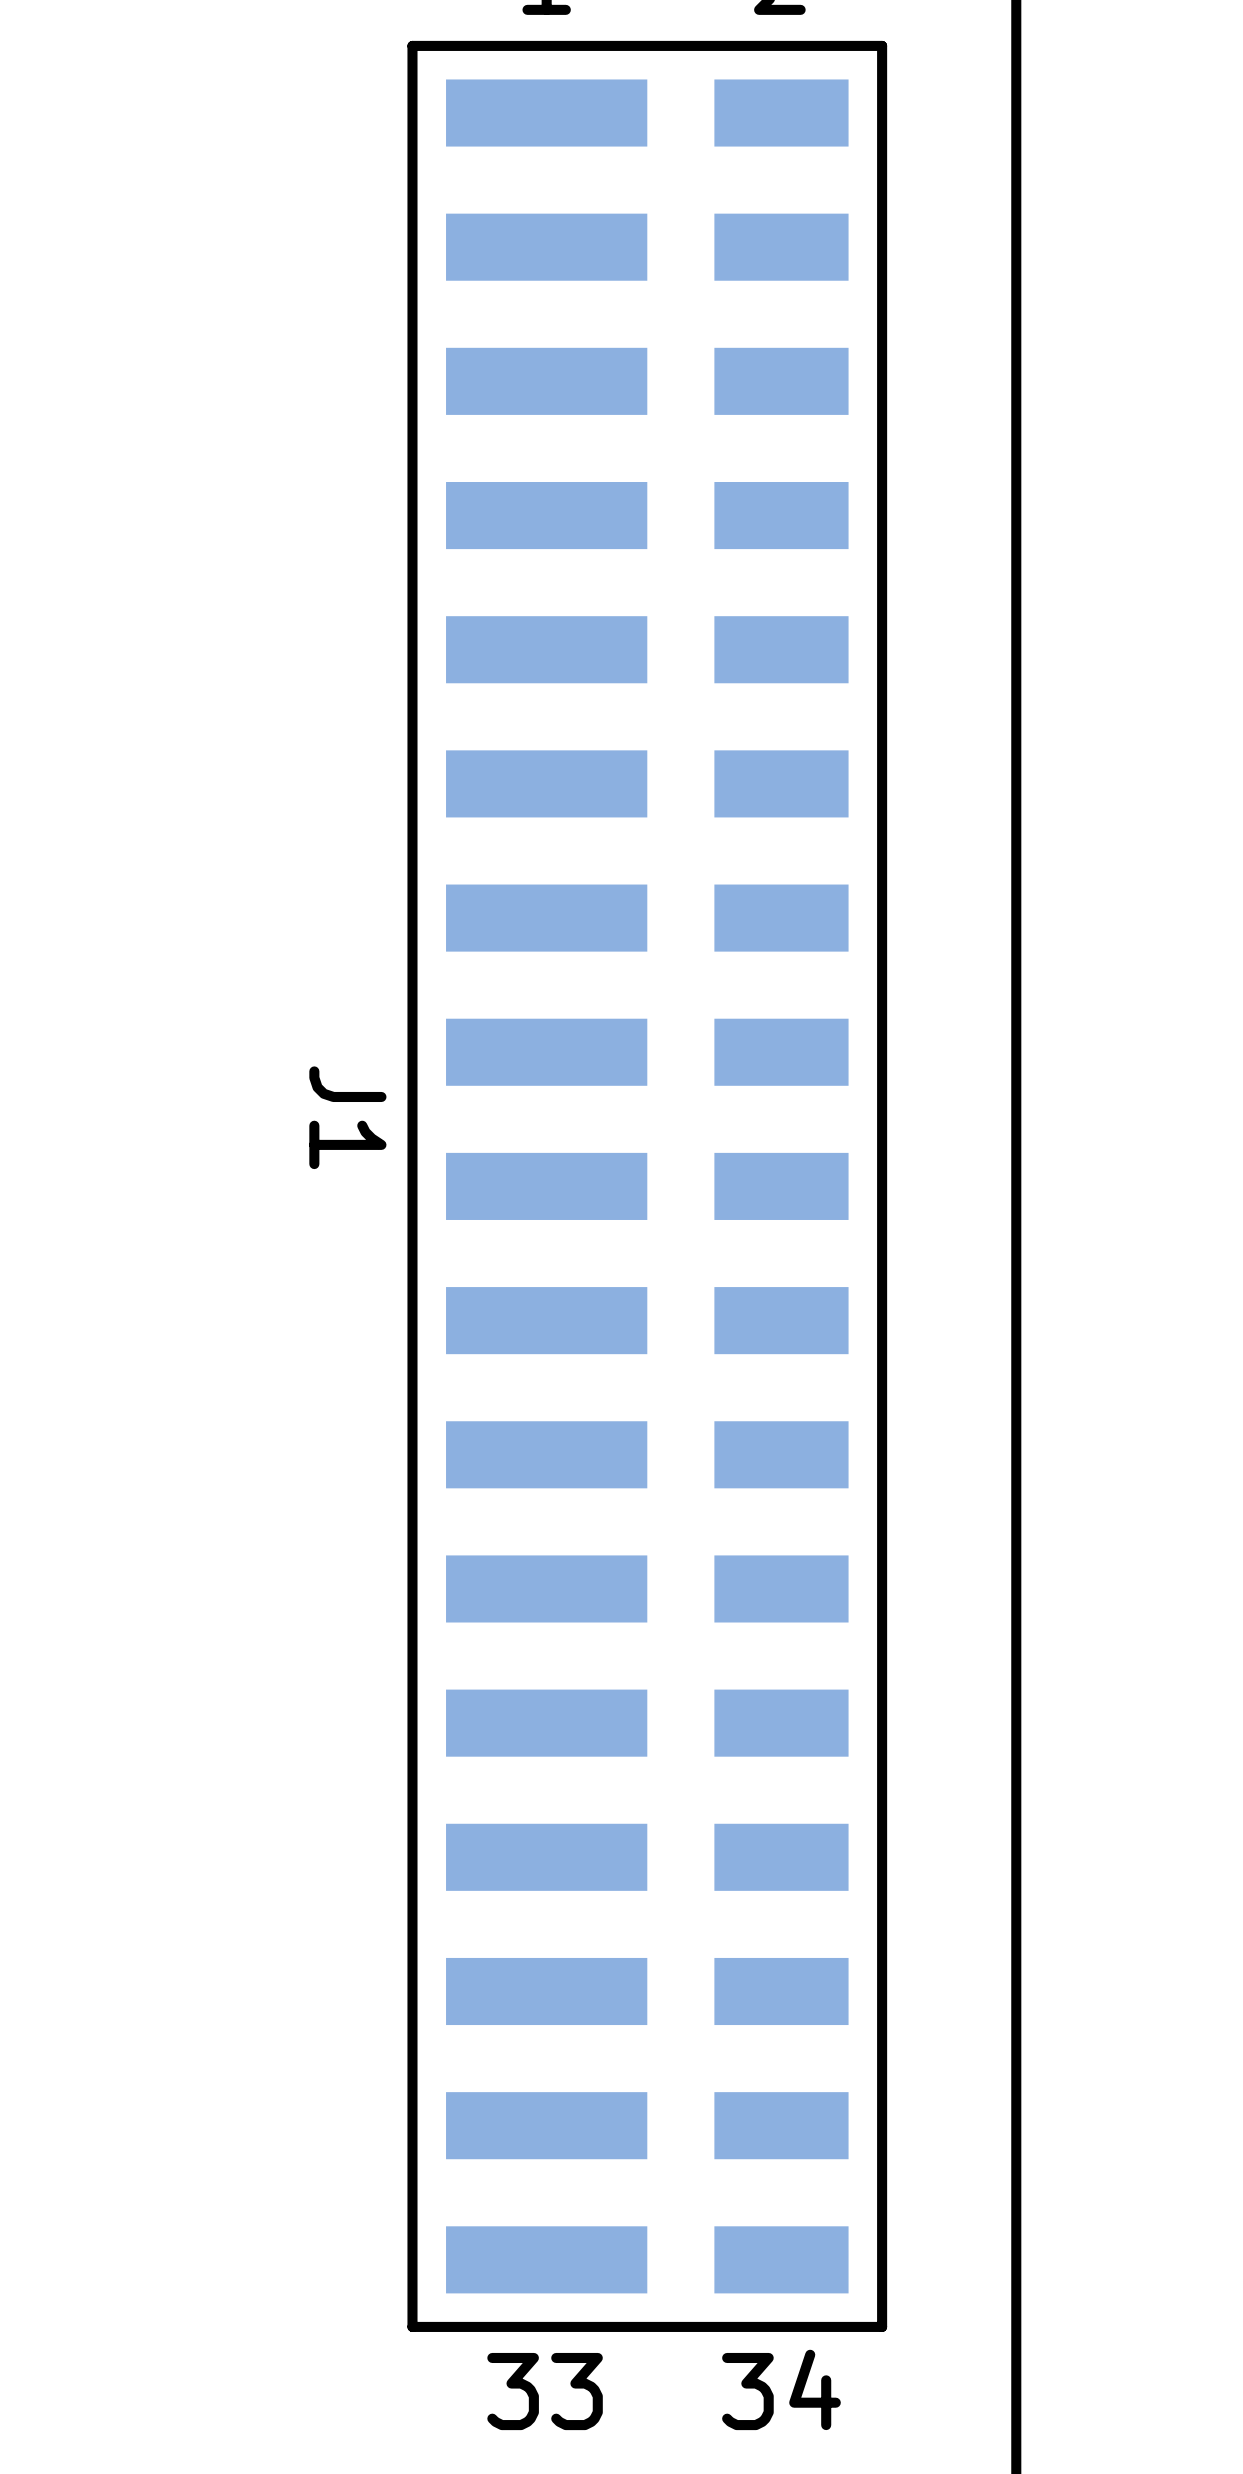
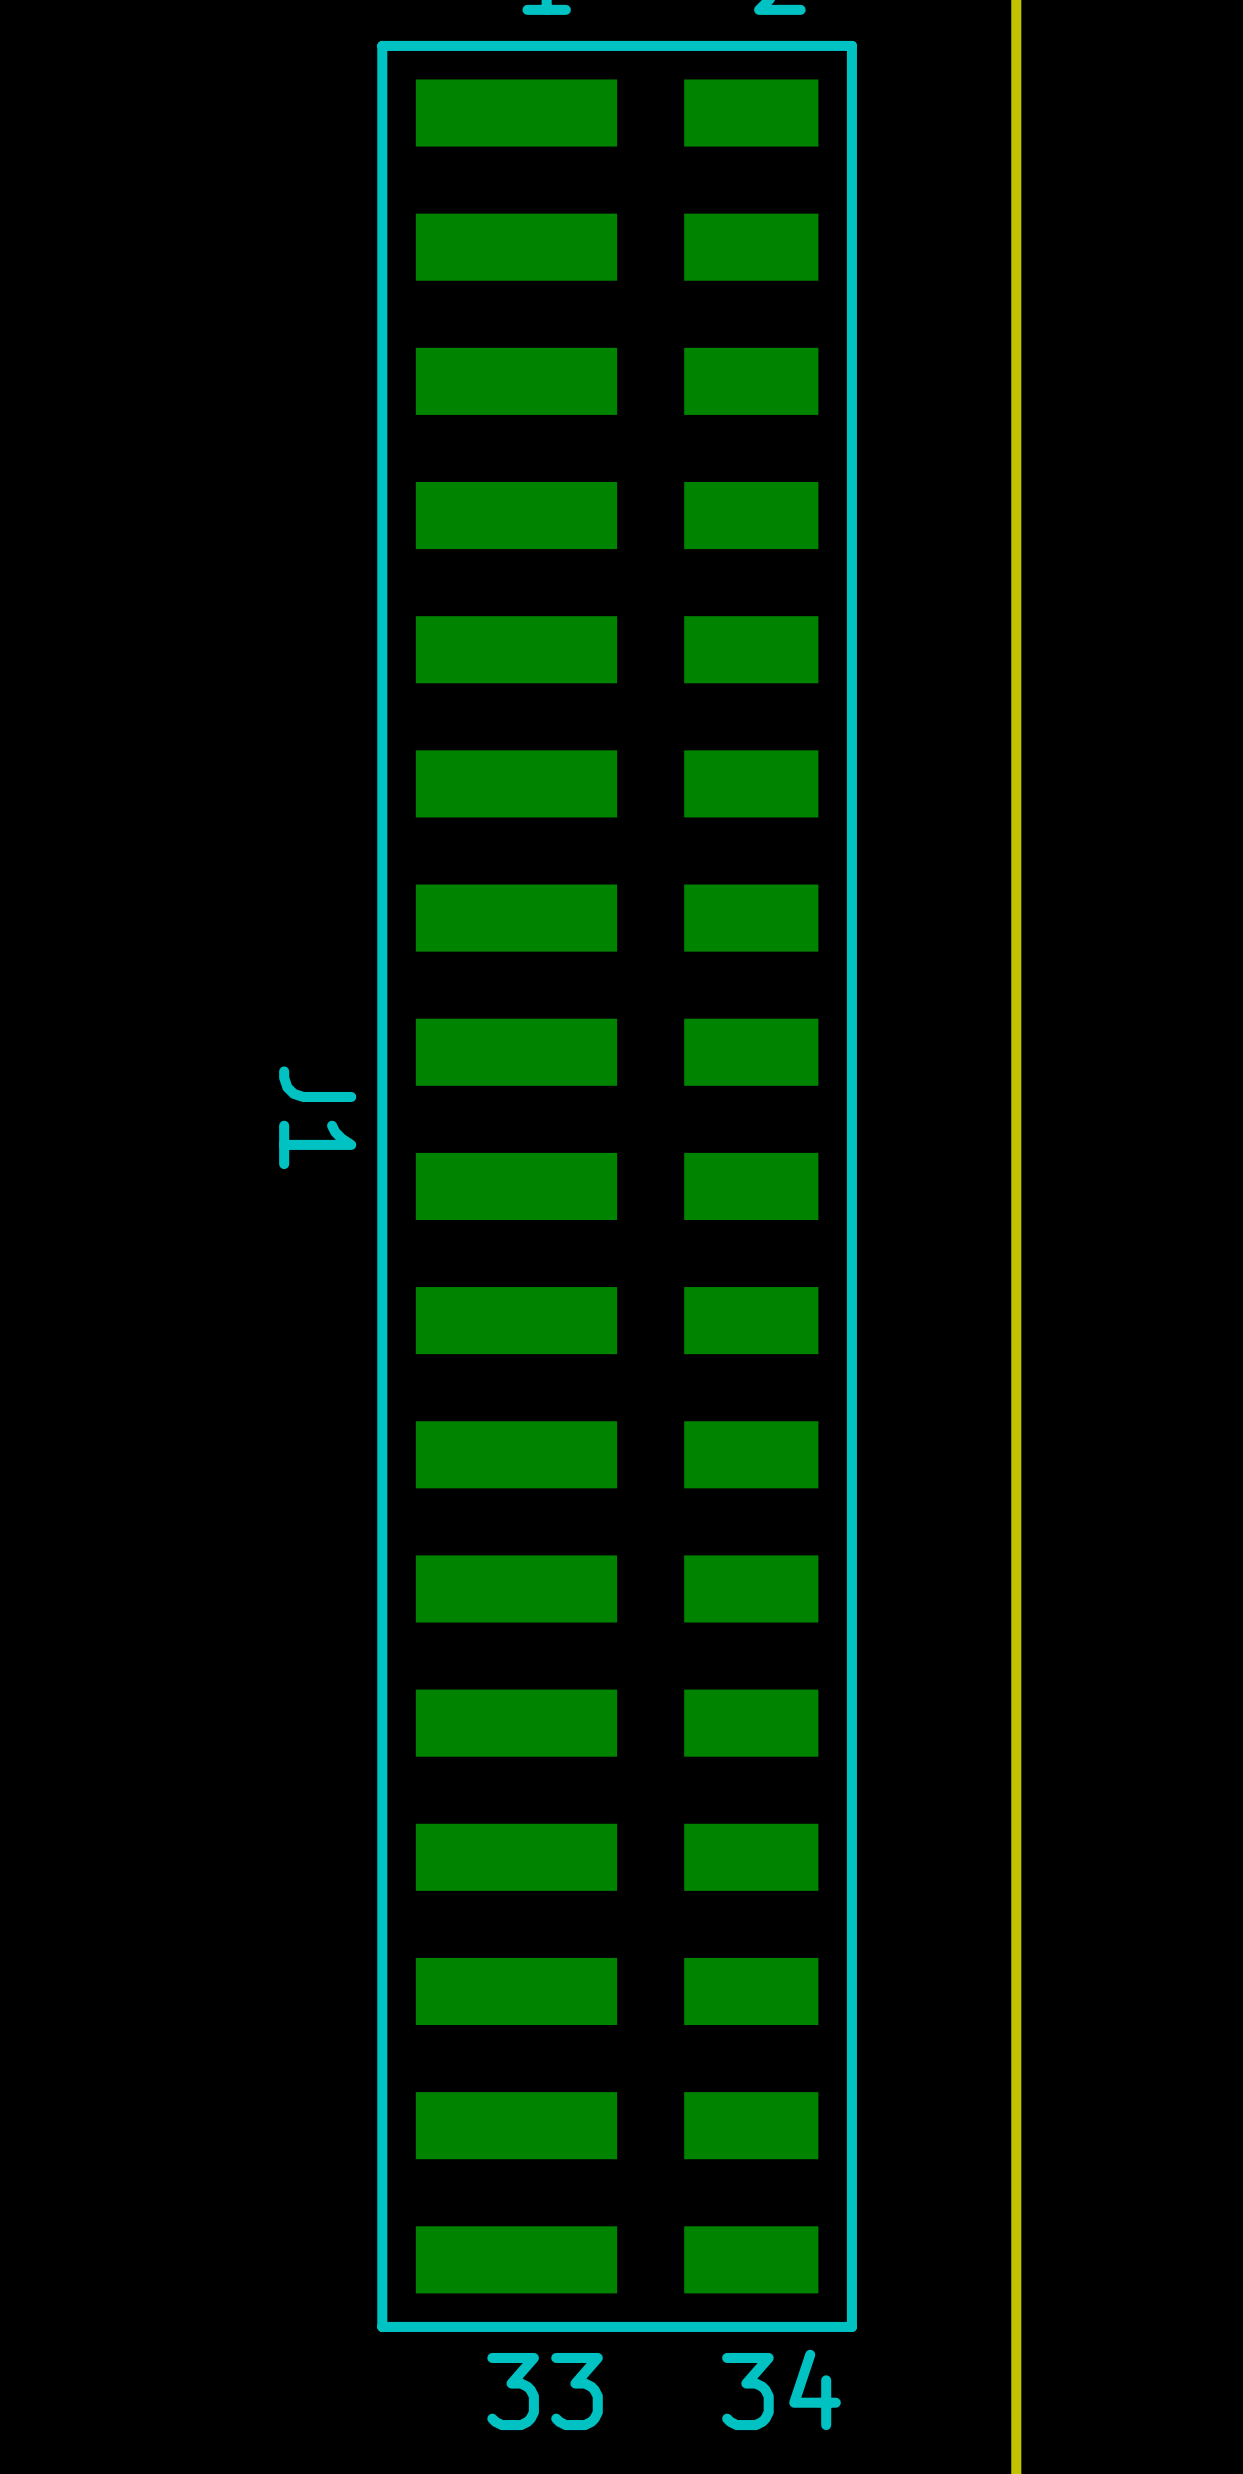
J1 position: (647, 1186) -> (617, 1186)

